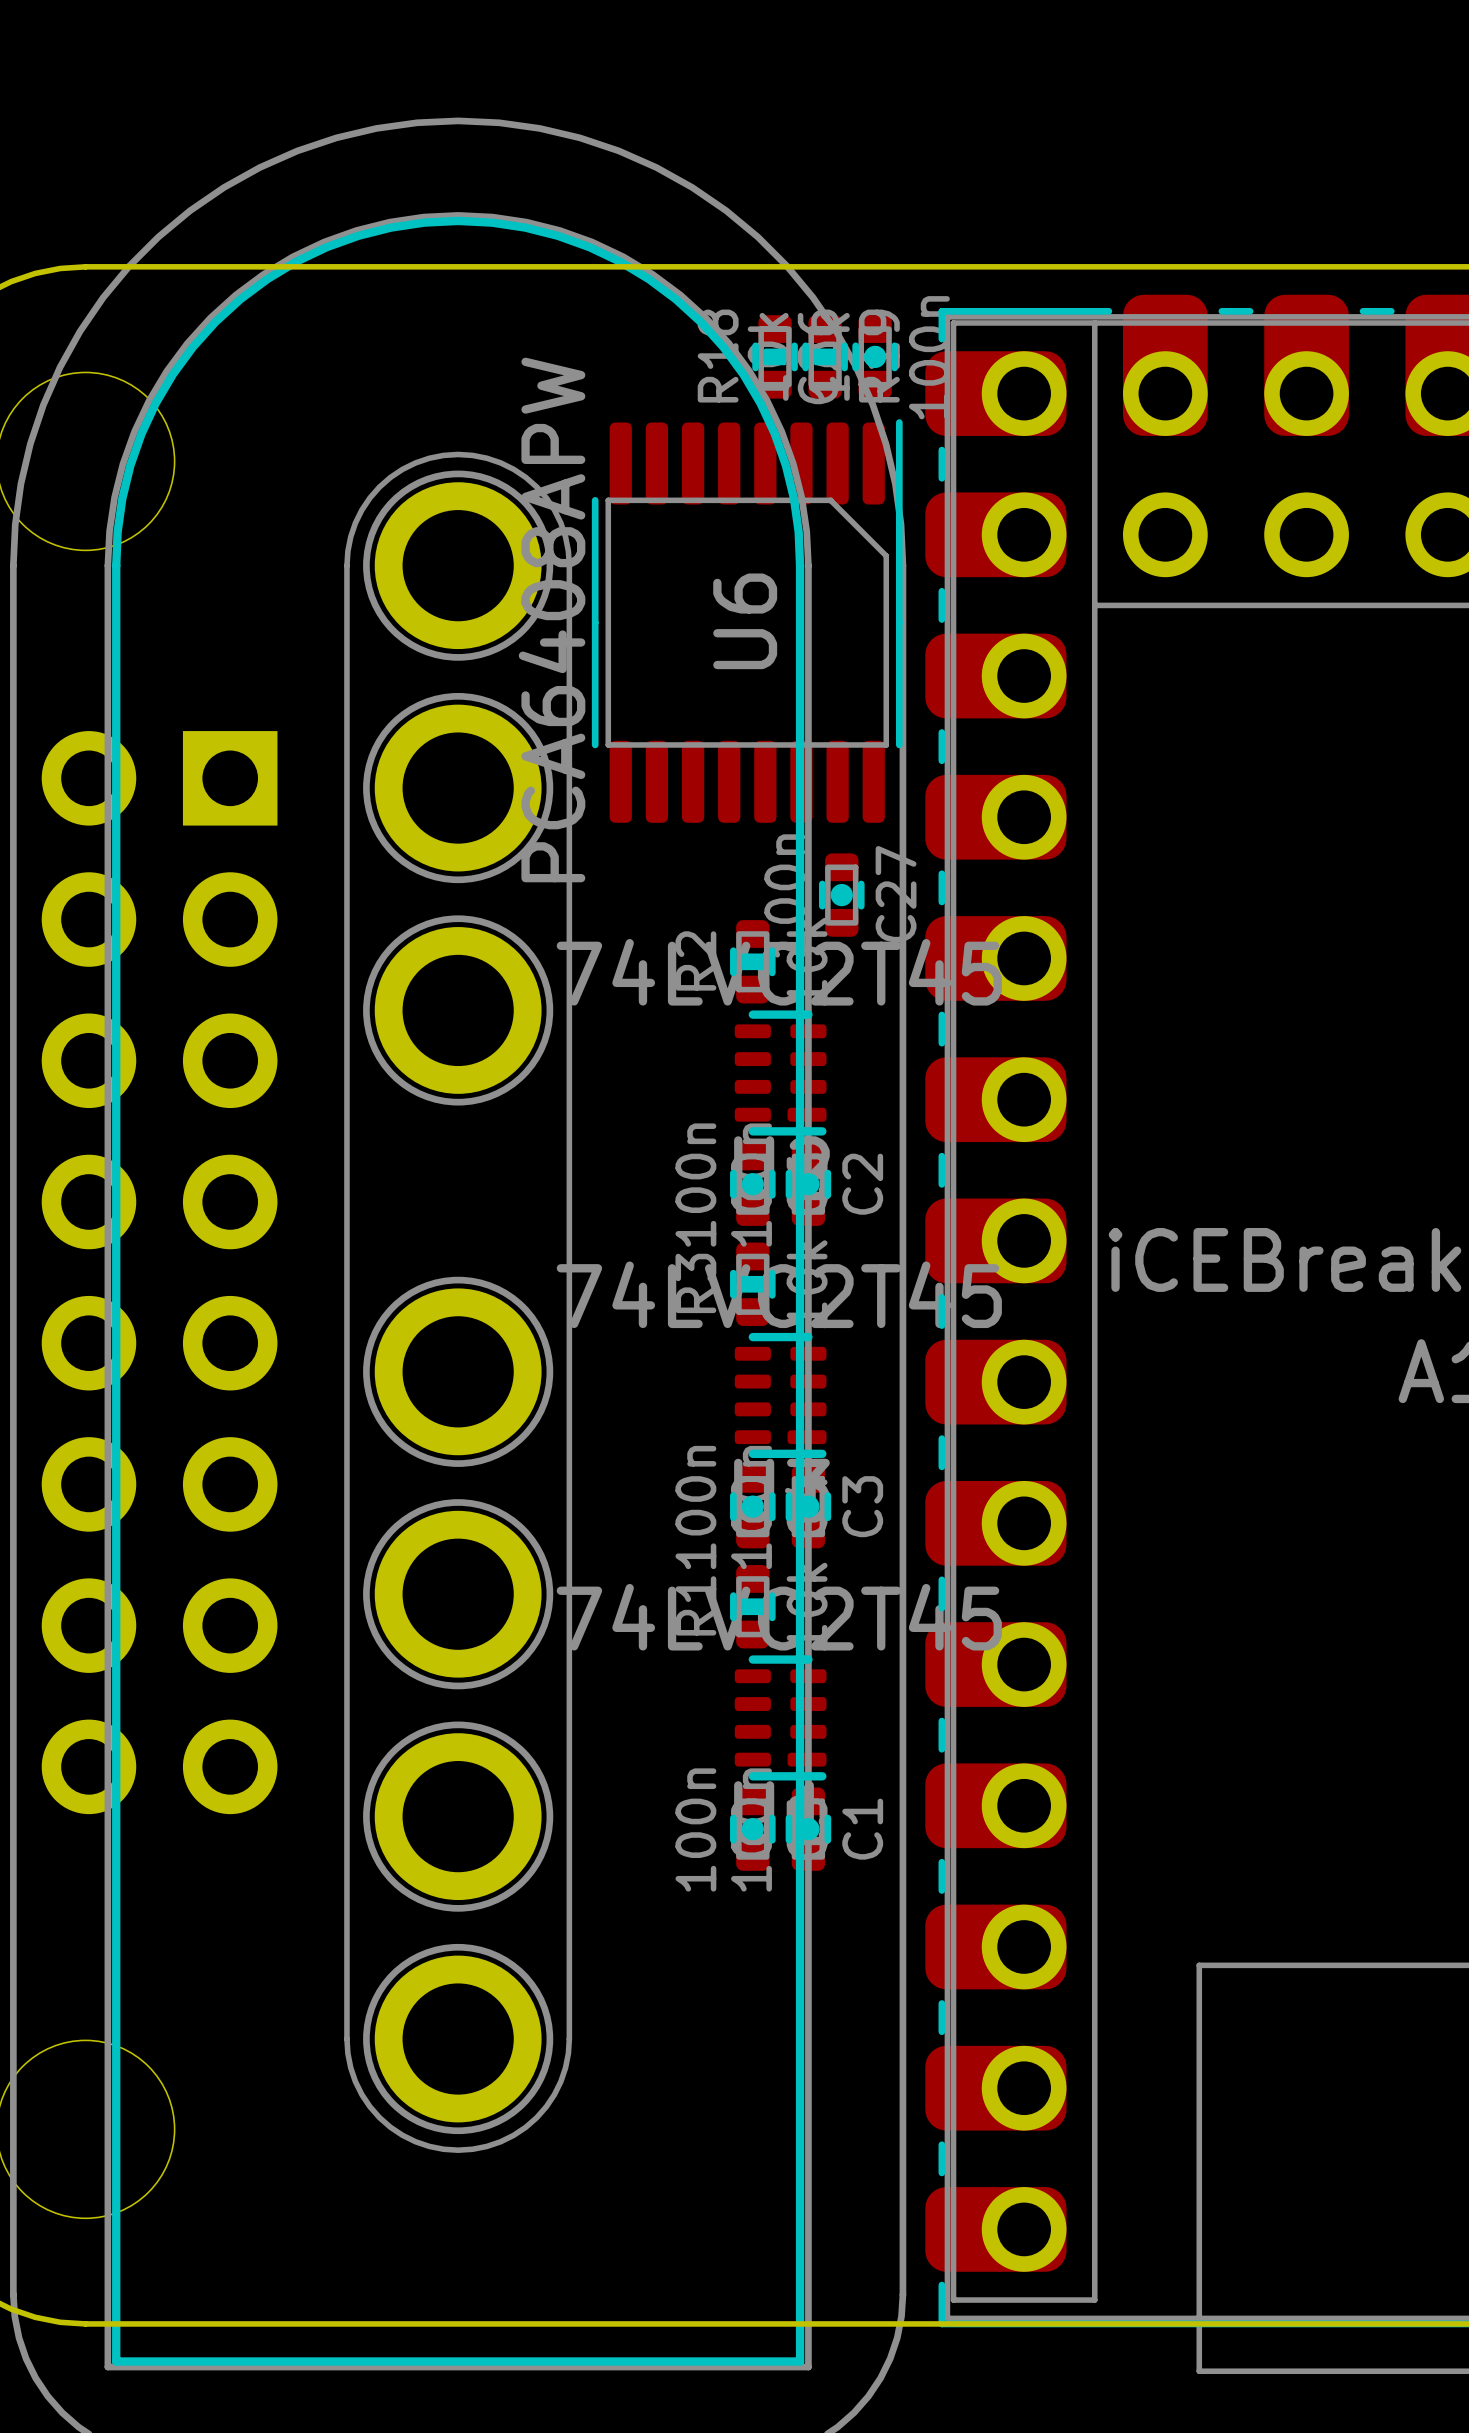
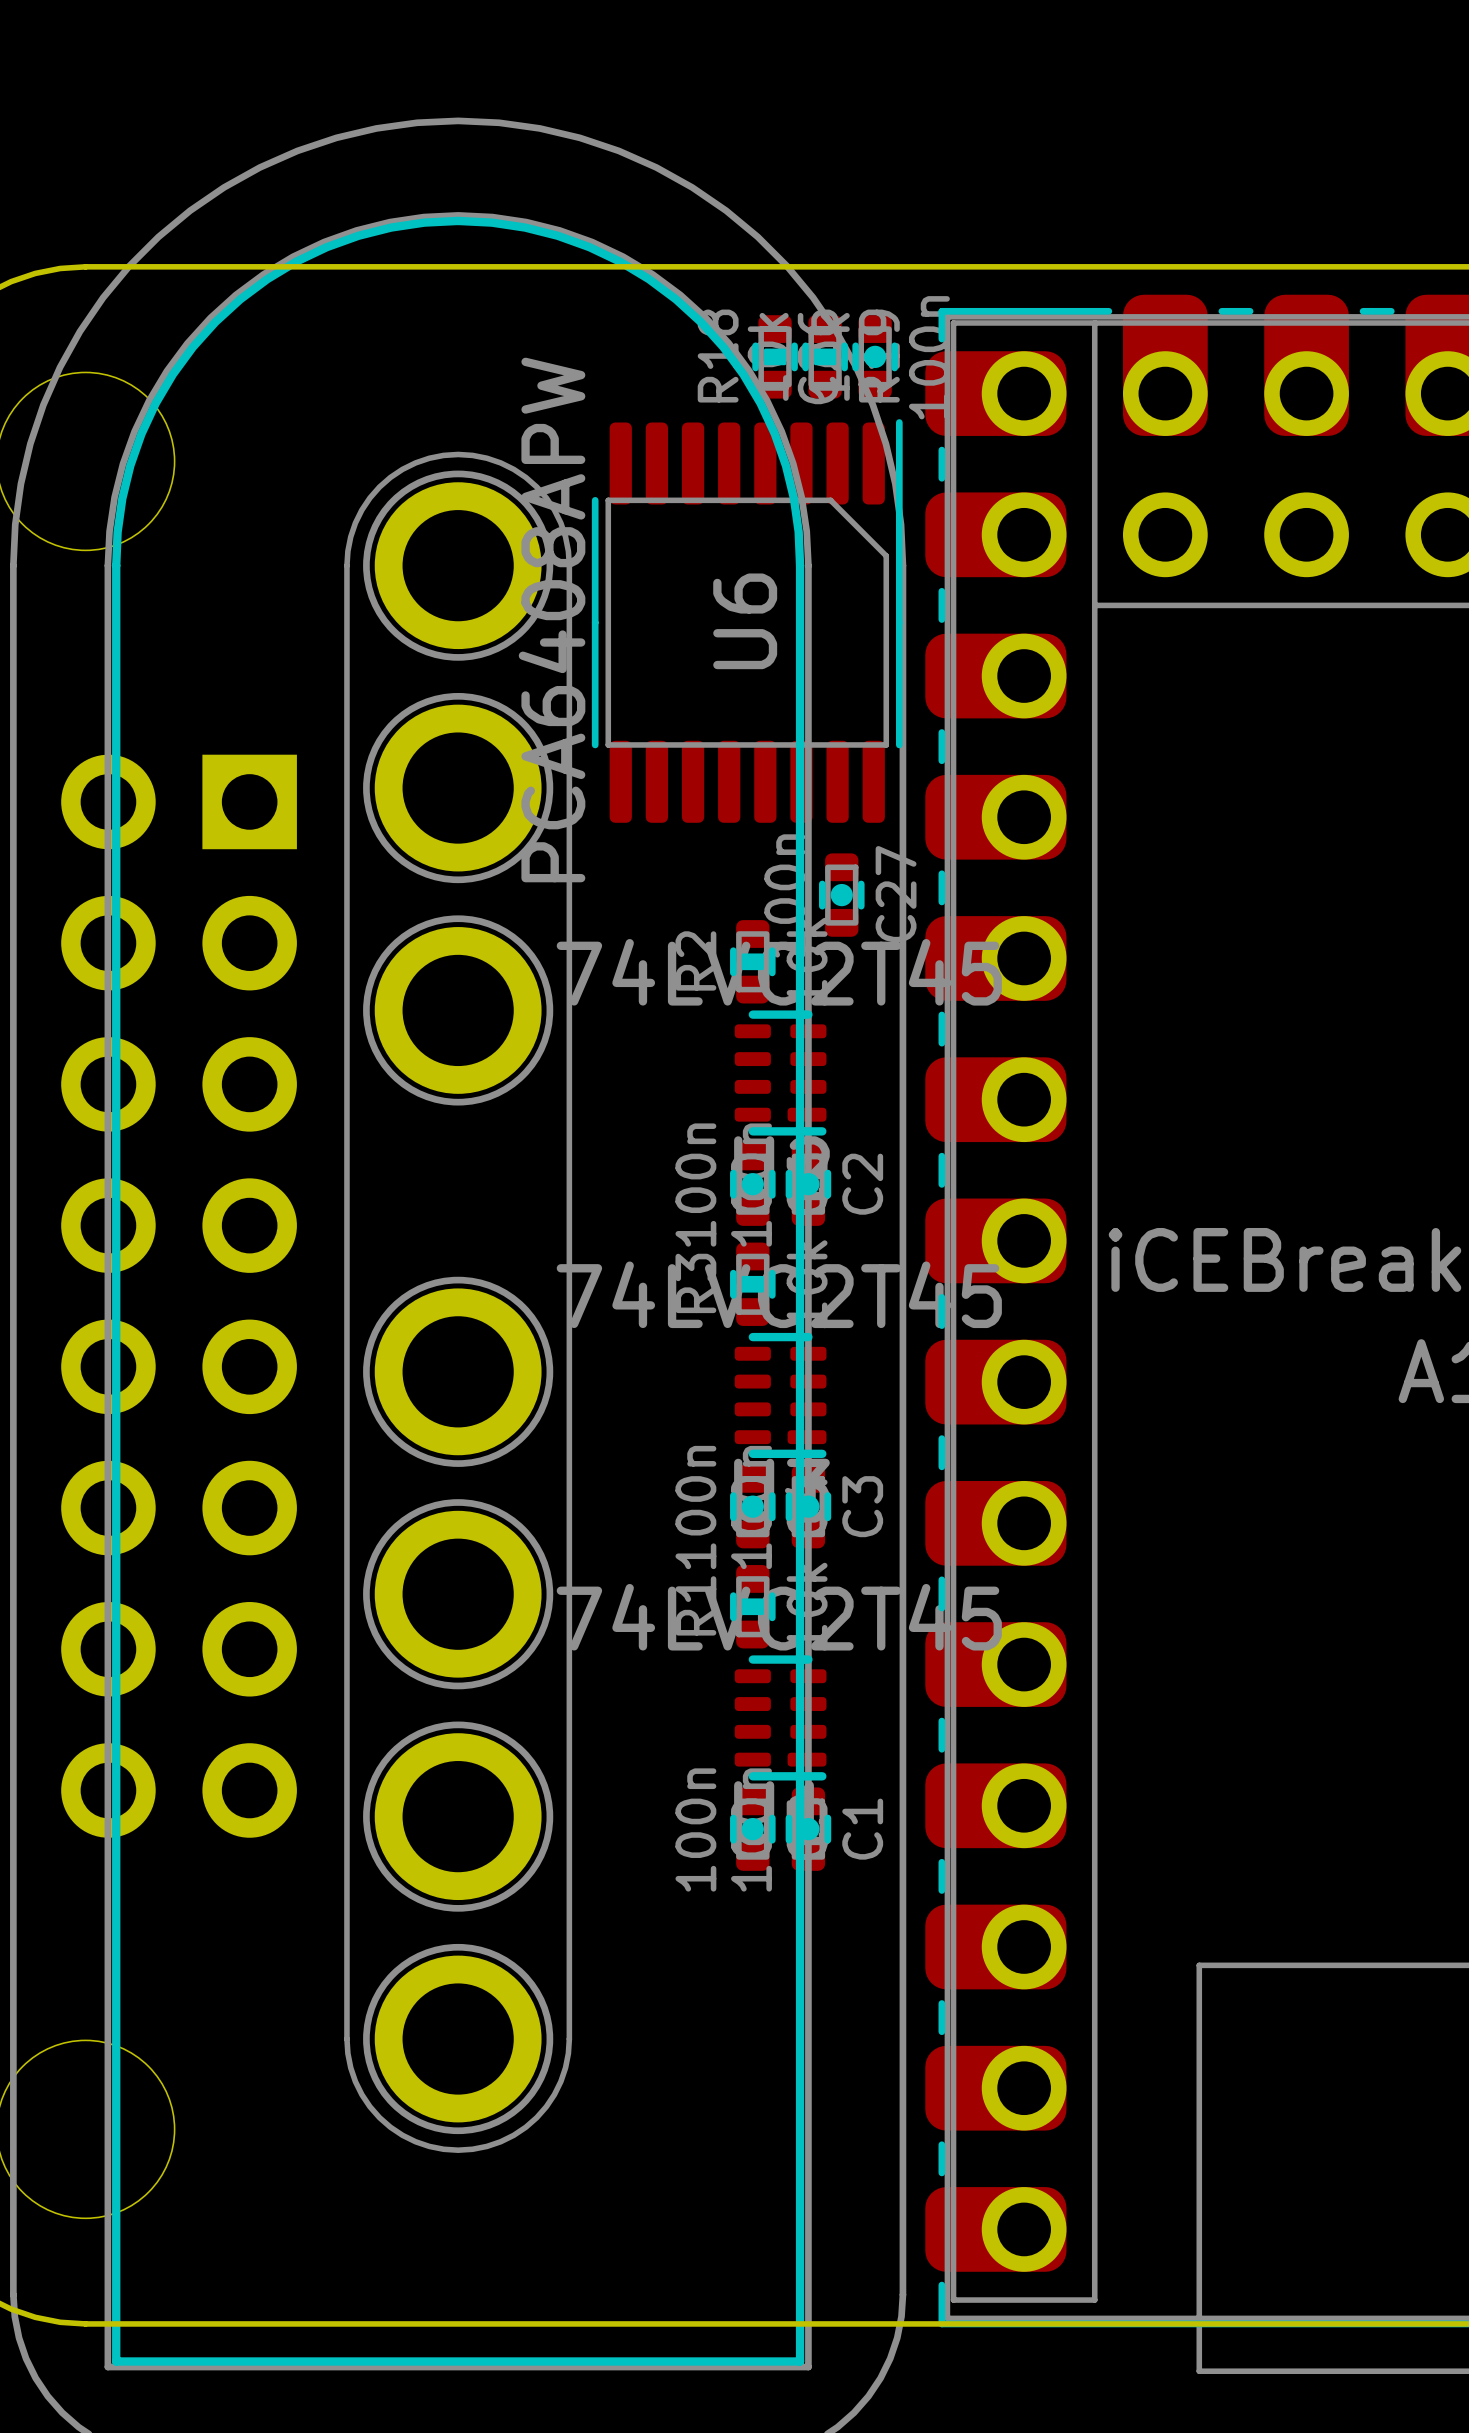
part position: (159, 1272) -> (179, 1296)

